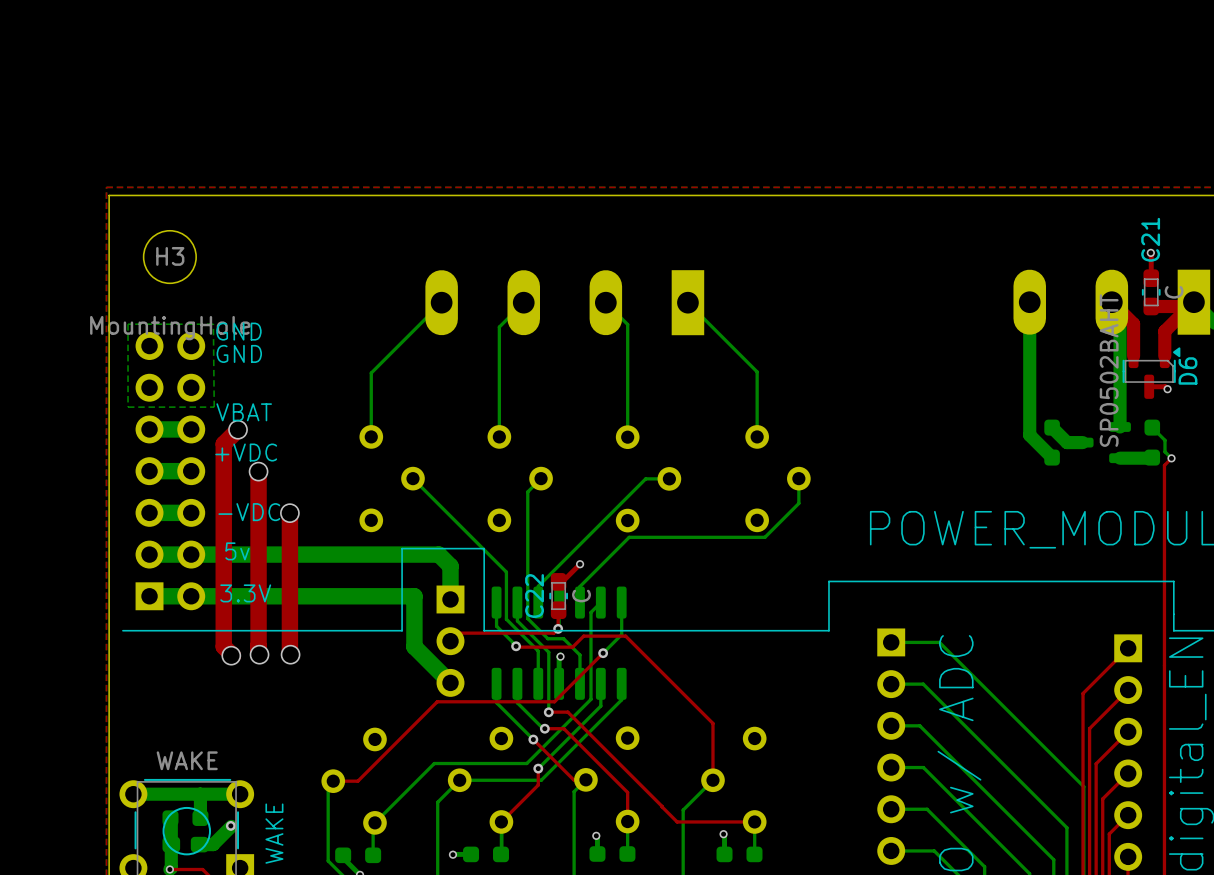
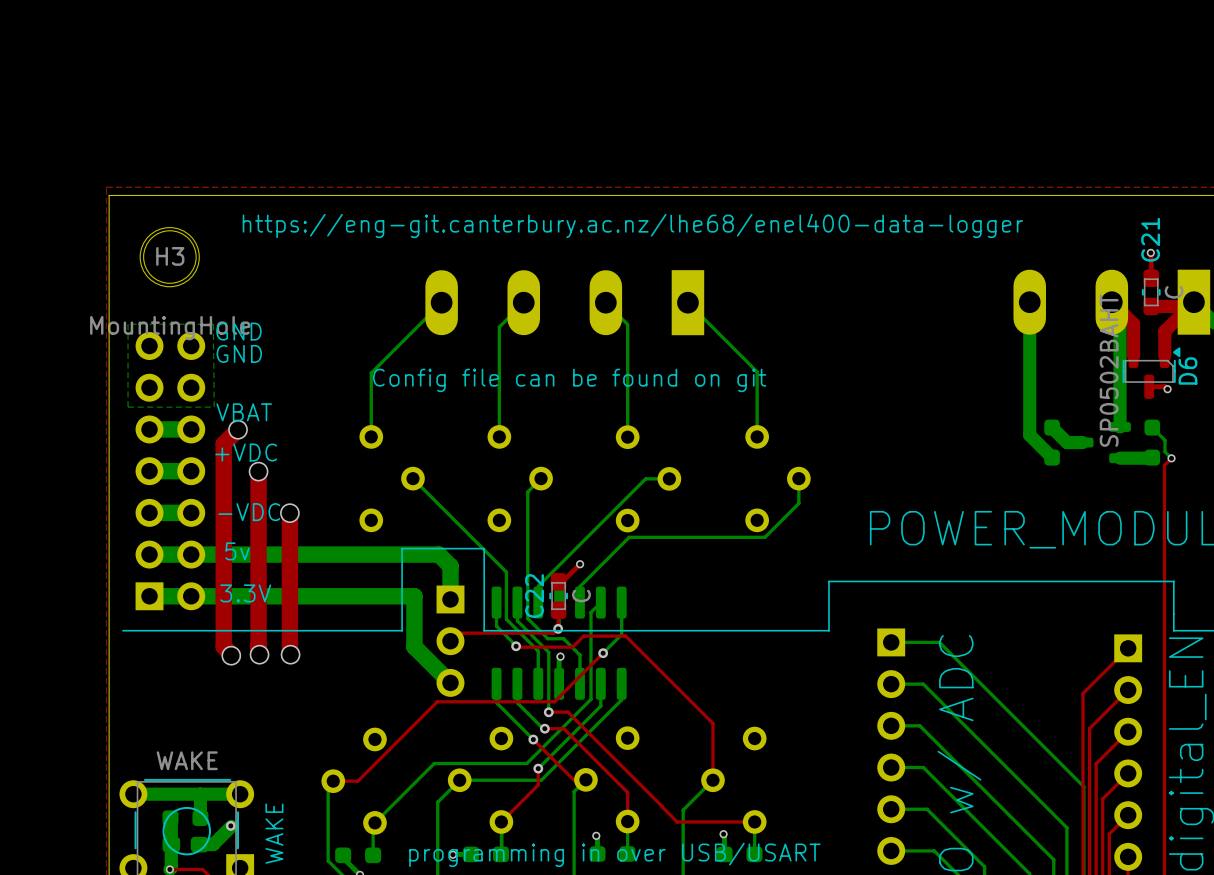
text: none -> https://eng-git.canterbury.ac.nz/lhe68/enel400-data-logger (632, 225)
round board edge: none -> [139, 227, 200, 288]
text: none -> Config file can be found on git (569, 380)
text: none -> programming in over USB/USART (614, 854)

